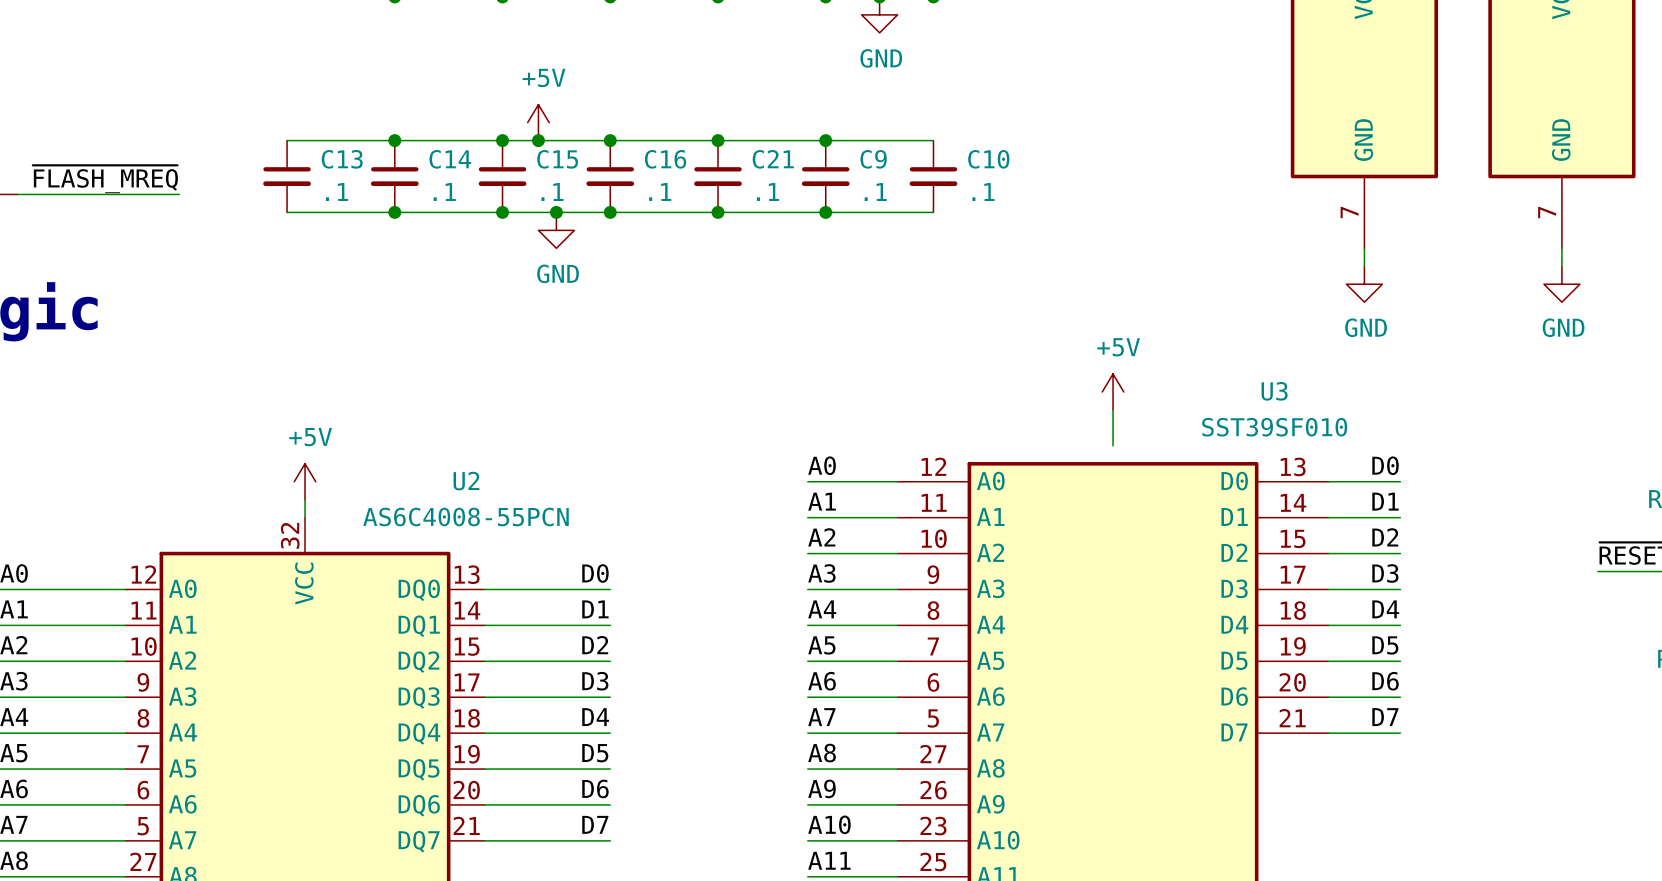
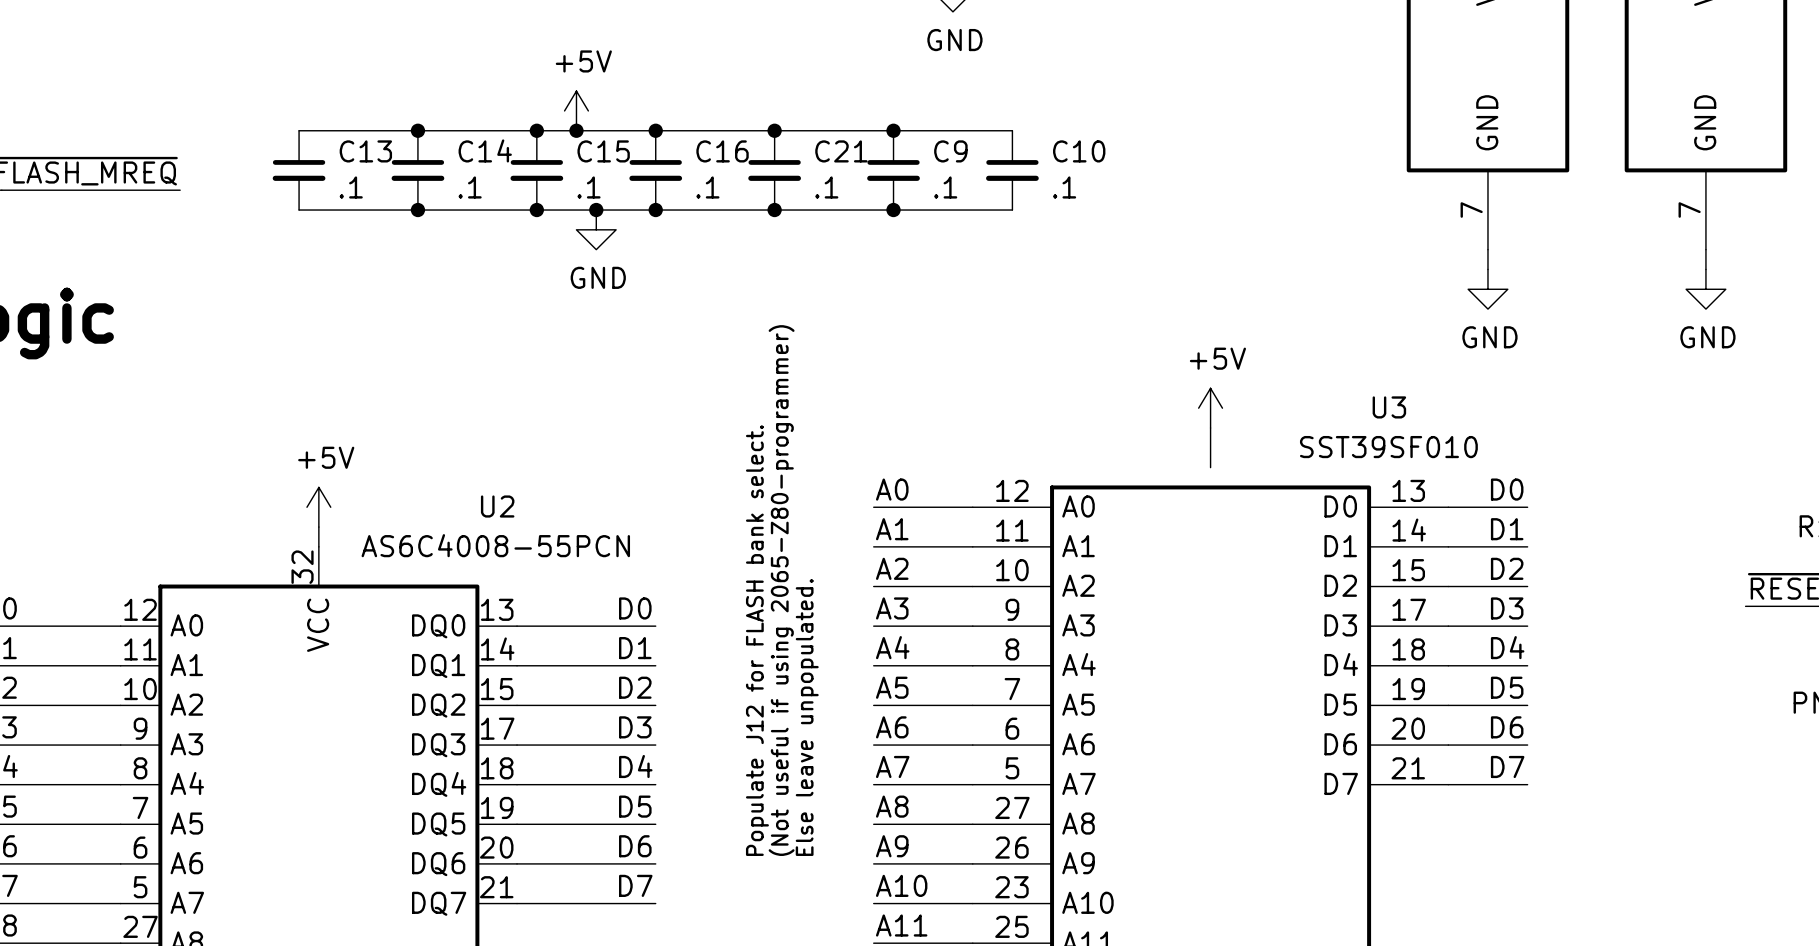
text: none -> (Not useful if using 2065-Z80-programmer) (781, 590)
text: none -> Populate J12 for FLASH bank select. (757, 640)
text: none -> Else leave unpopulated. (807, 717)

